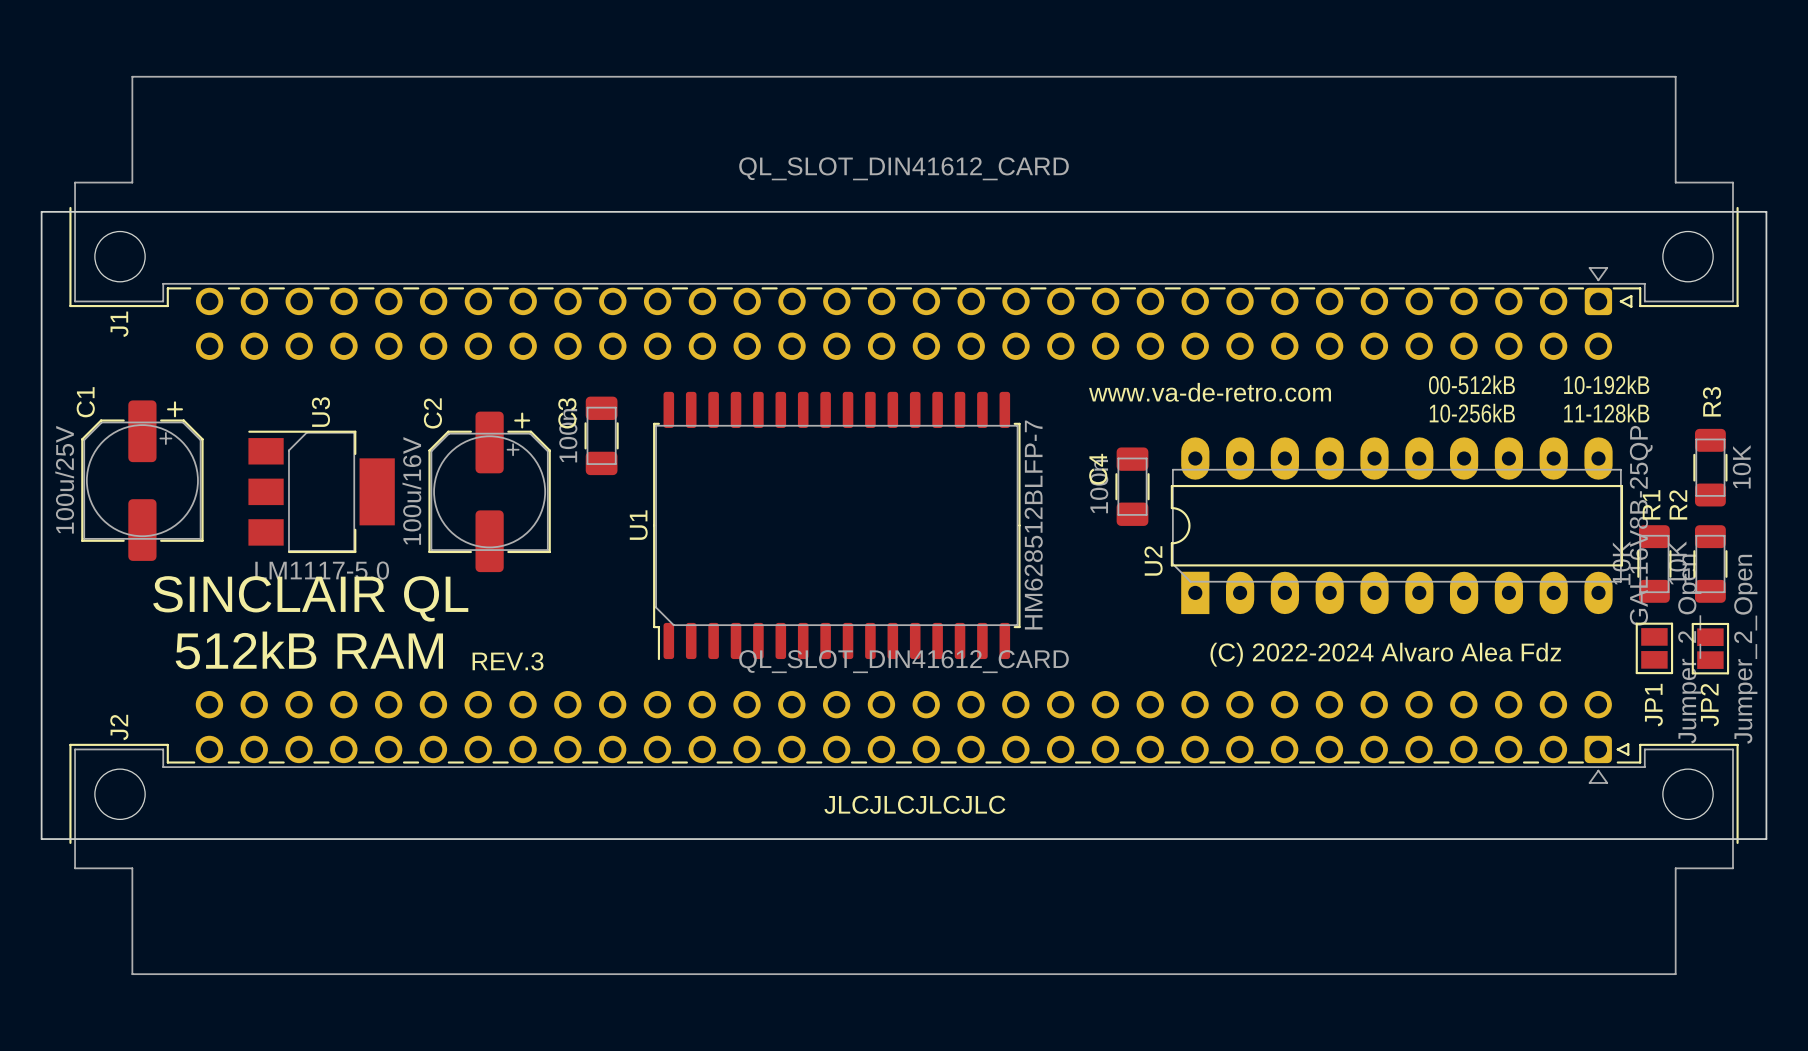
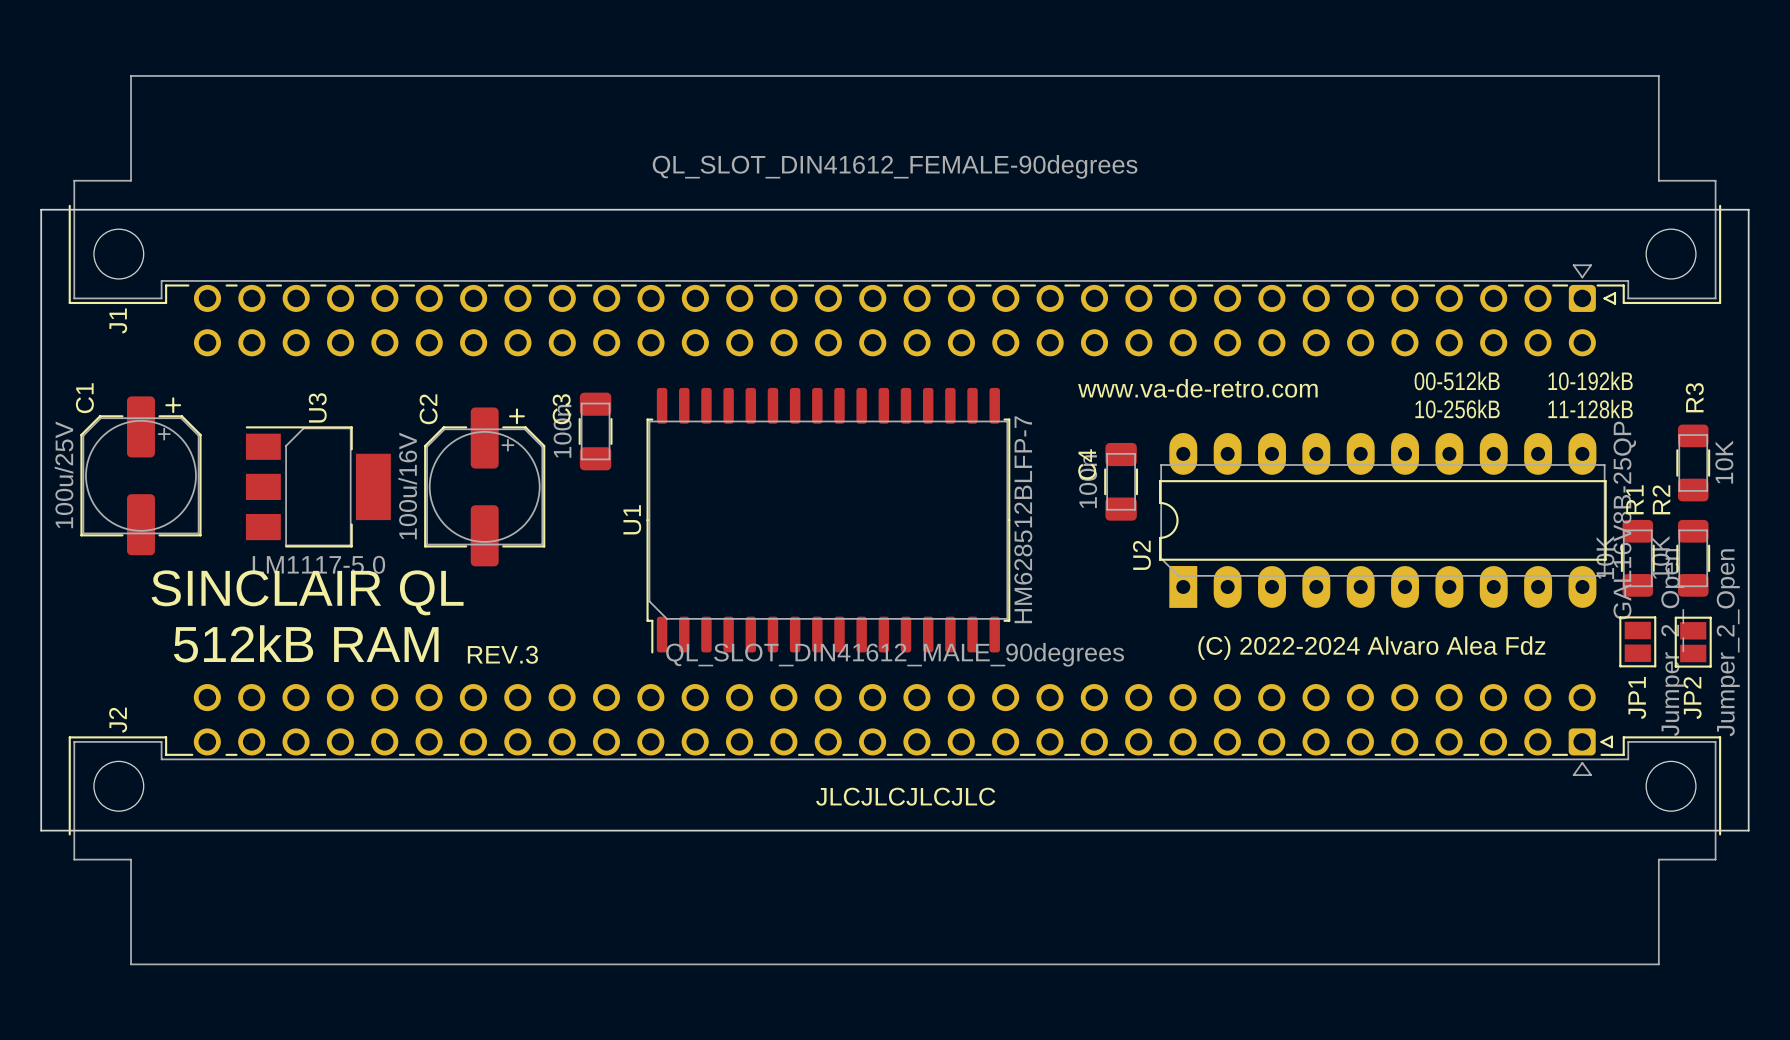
J1 value: QL_SLOT_DIN41612_CARD (904, 168) -> QL_SLOT_DIN41612_FEMALE-90degrees (895, 166)
J2 value: QL_SLOT_DIN41612_CARD (904, 661) -> QL_SLOT_DIN41612_MALE_90degrees (895, 654)

